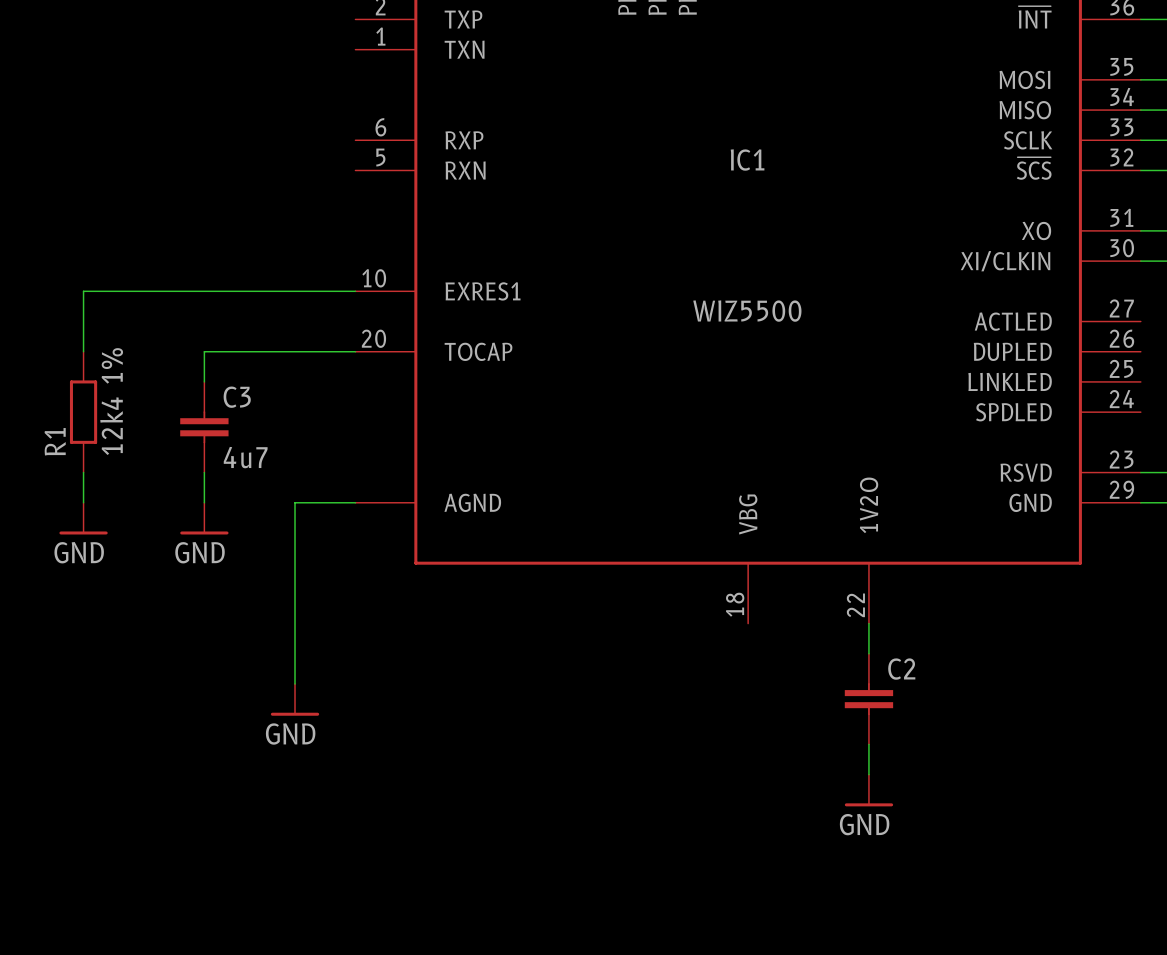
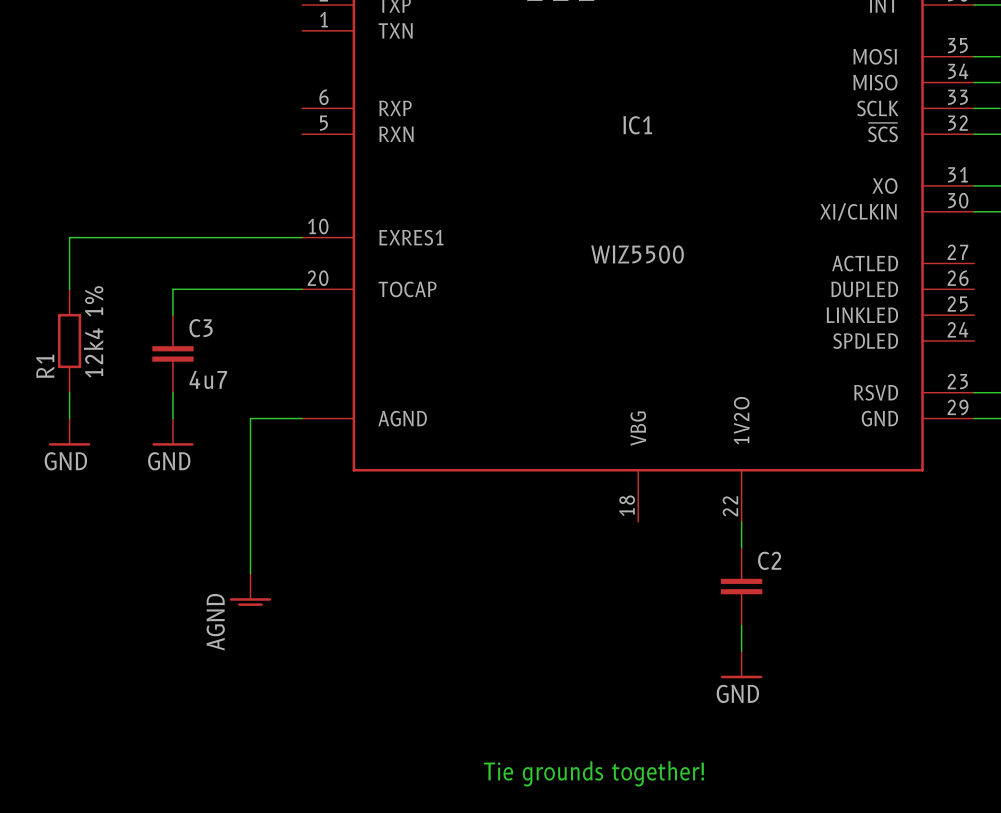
power symbol: GND (295, 699) -> AGND (250, 589)
text: none -> Tie grounds together! (594, 773)

